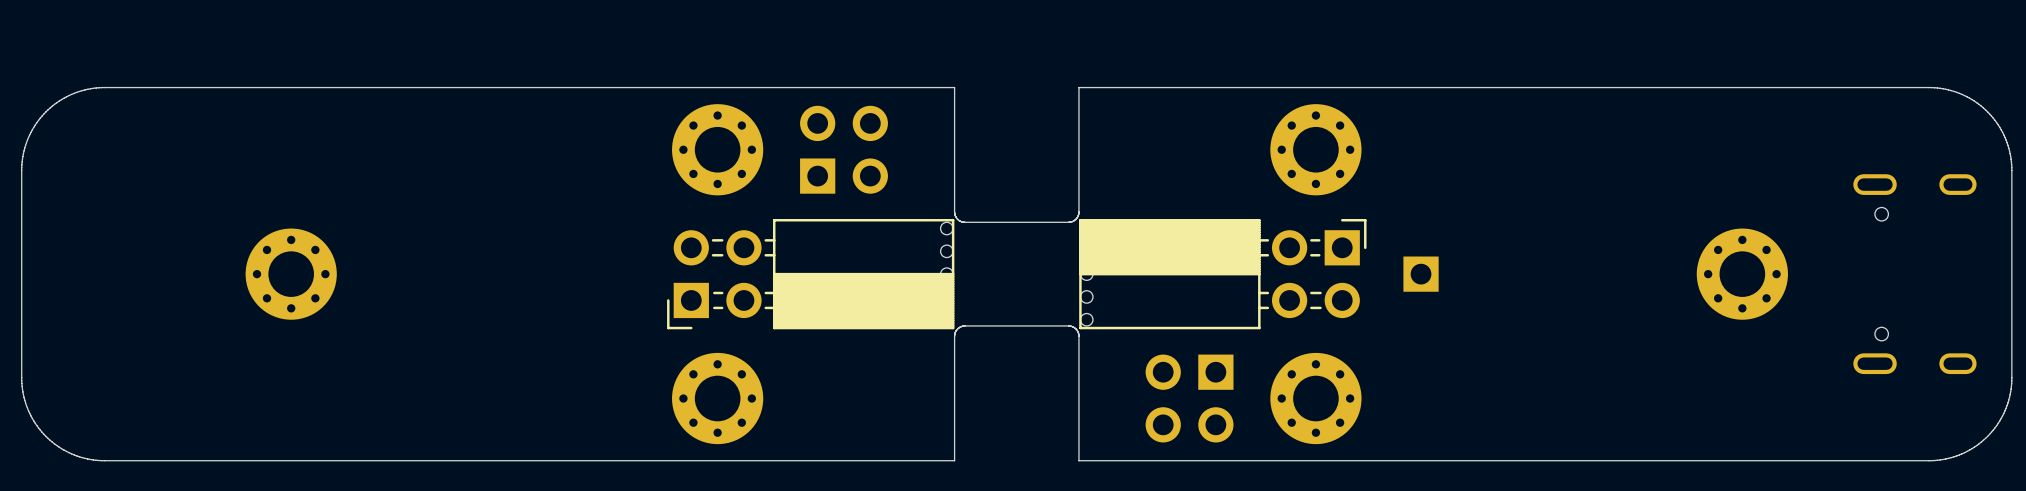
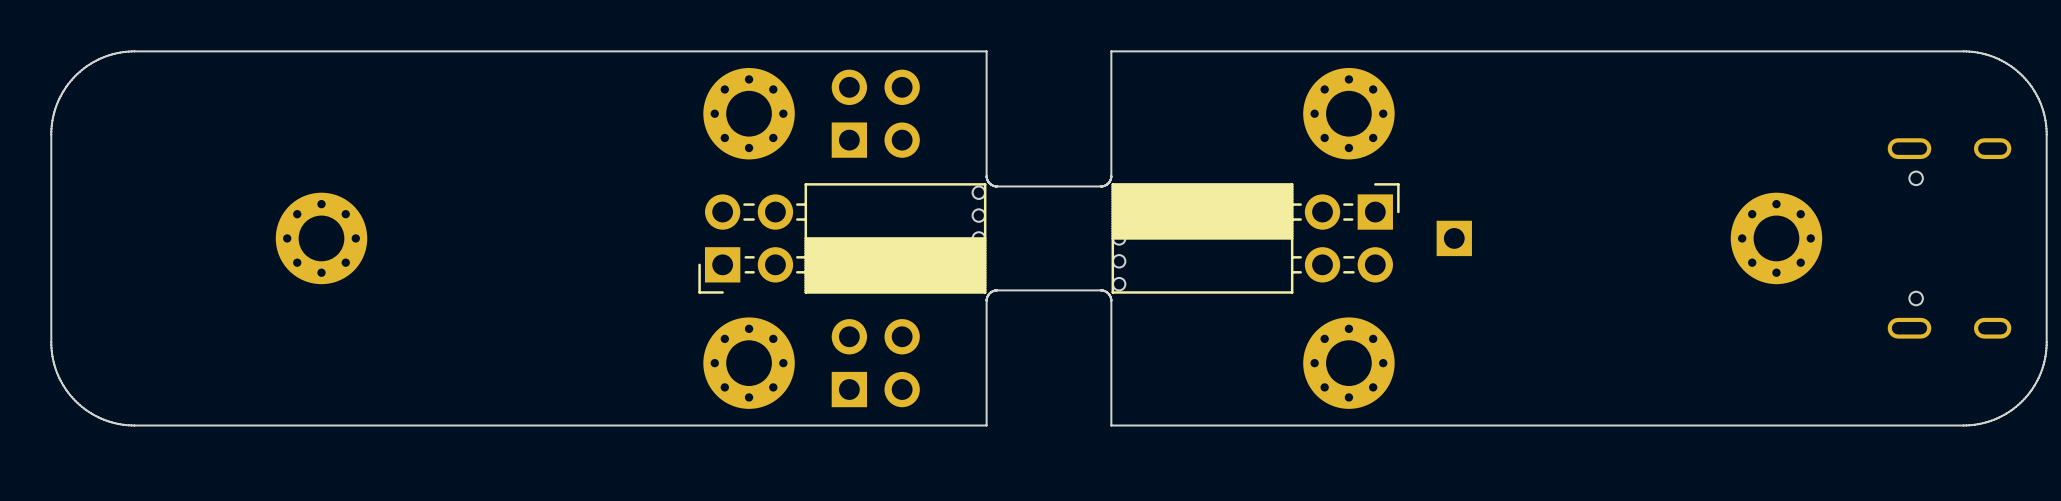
part rotation: 0° (1189, 398) -> 180° (875, 363)
part position: (1189, 398) -> (875, 363)

